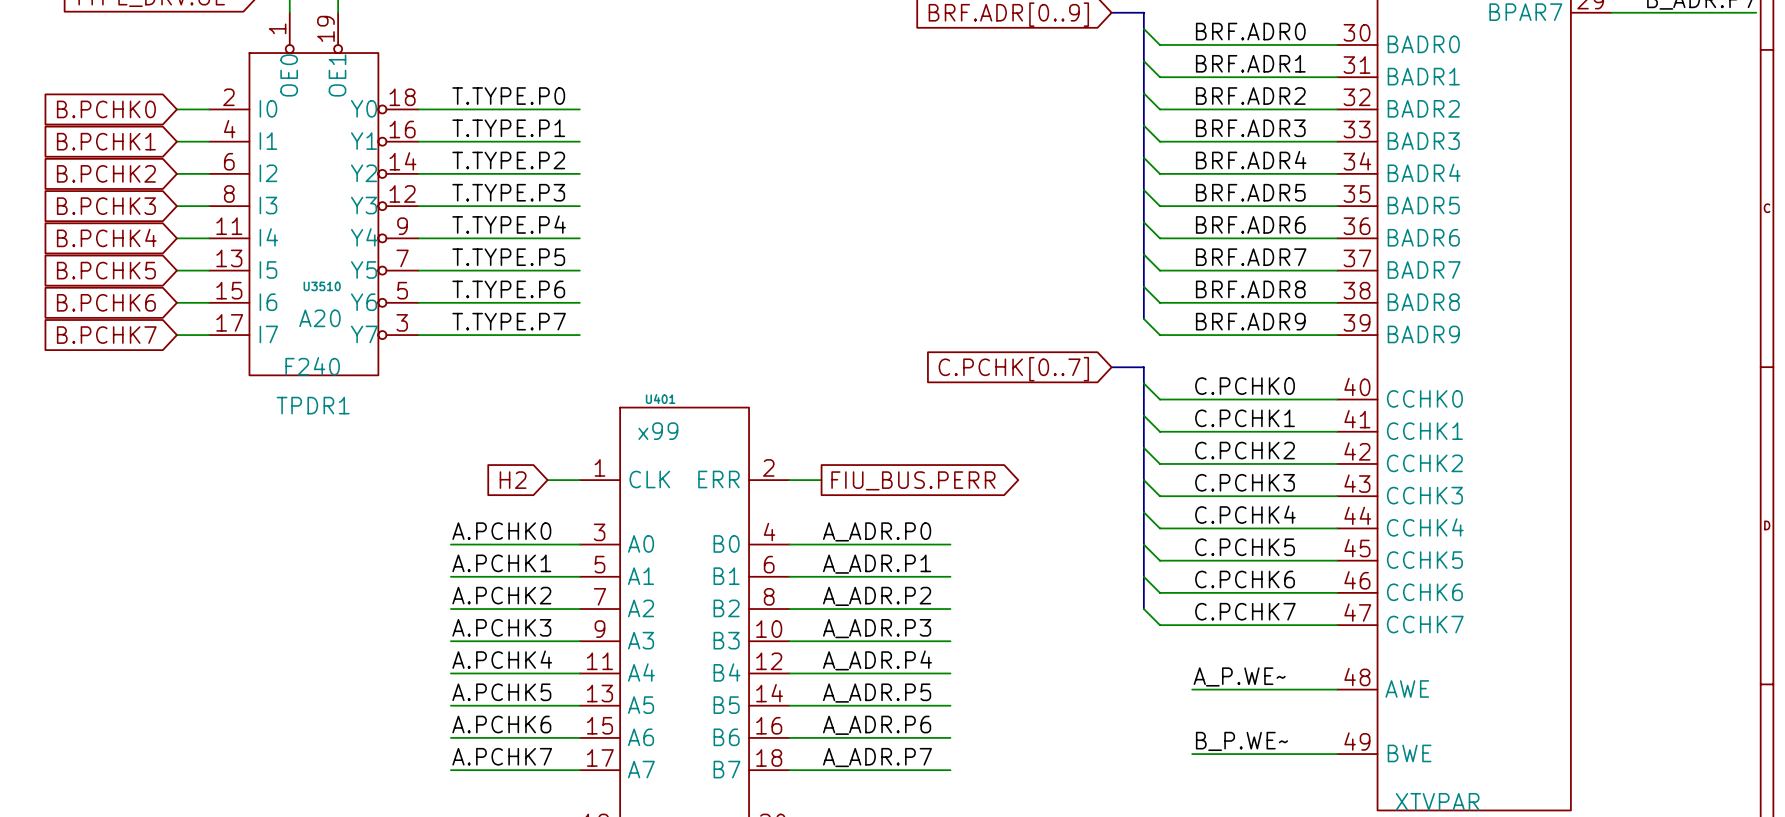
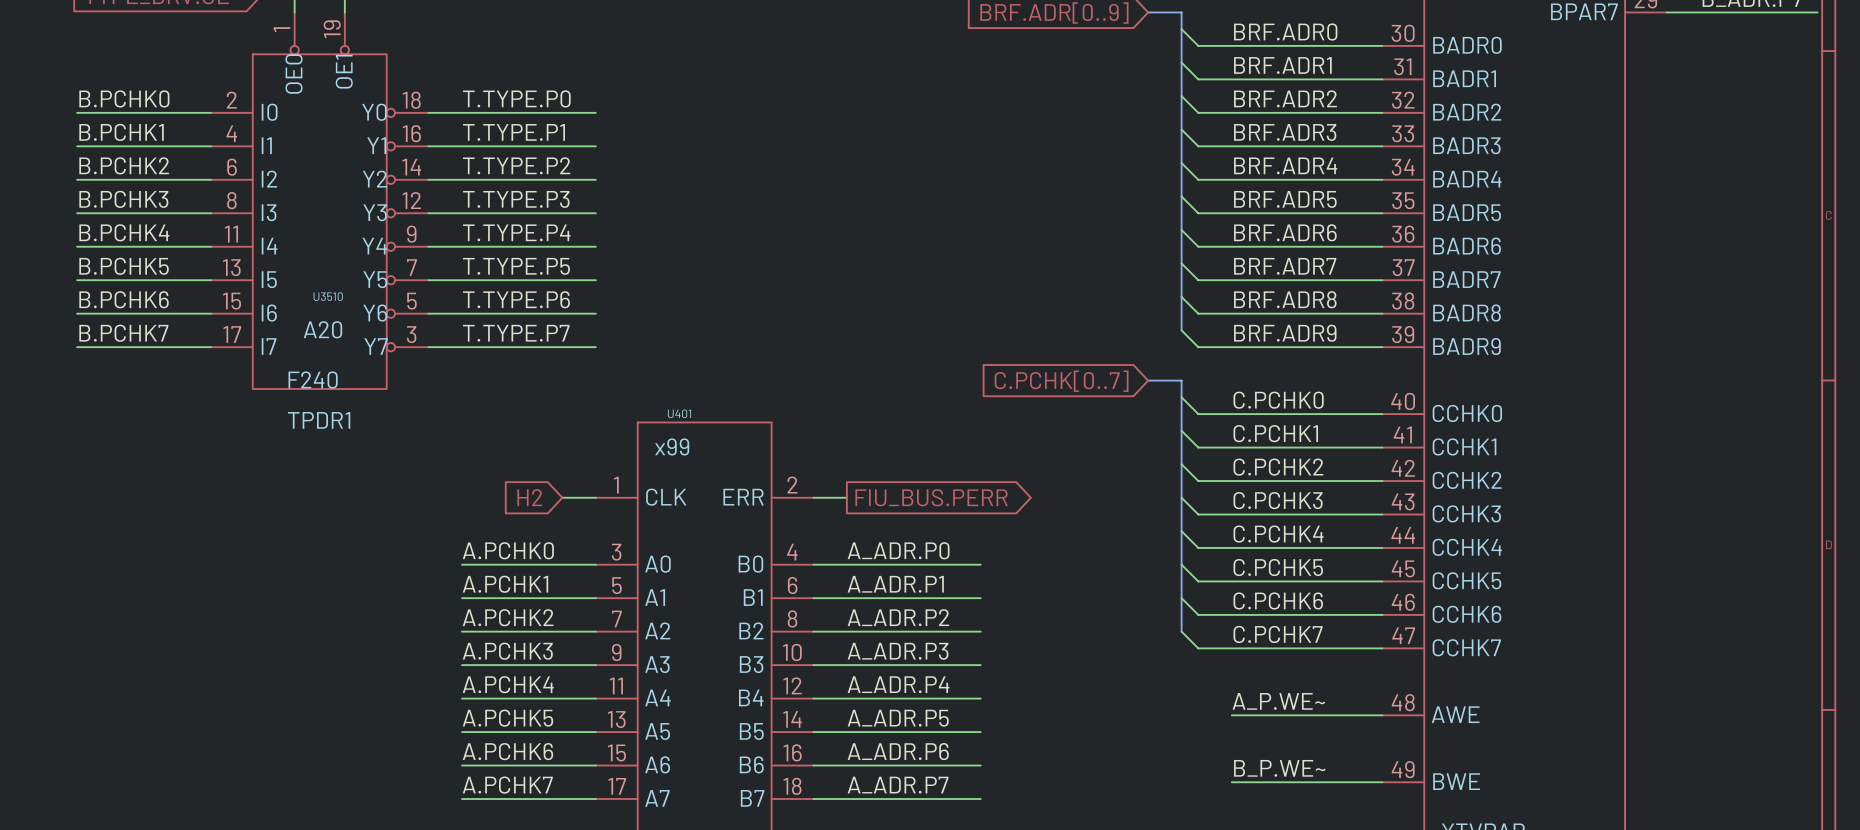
label: none -> B.PCHK0 (124, 98)
wire: none -> (77, 112) (177, 112)
global label: B.PCHK0 (106, 109) -> none
label: none -> B.PCHK1 (121, 132)
wire: none -> (77, 146) (177, 146)
global label: B.PCHK1 (106, 141) -> none
label: none -> B.PCHK2 (124, 165)
wire: none -> (77, 179) (177, 179)
global label: B.PCHK2 (106, 173) -> none
label: none -> B.PCHK3 (123, 199)
wire: none -> (77, 213) (177, 213)
global label: B.PCHK3 (106, 206) -> none
label: none -> B.PCHK4 (124, 232)
global label: B.PCHK4 (106, 237) -> none
wire: none -> (77, 246) (177, 246)
label: none -> B.PCHK5 (124, 266)
wire: none -> (77, 280) (177, 280)
global label: B.PCHK5 (106, 270) -> none
label: none -> B.PCHK6 (124, 299)
wire: none -> (77, 313) (177, 313)
global label: B.PCHK6 (106, 302) -> none
label: none -> B.PCHK7 (123, 333)
wire: none -> (77, 347) (177, 347)
global label: B.PCHK7 (106, 335) -> none

